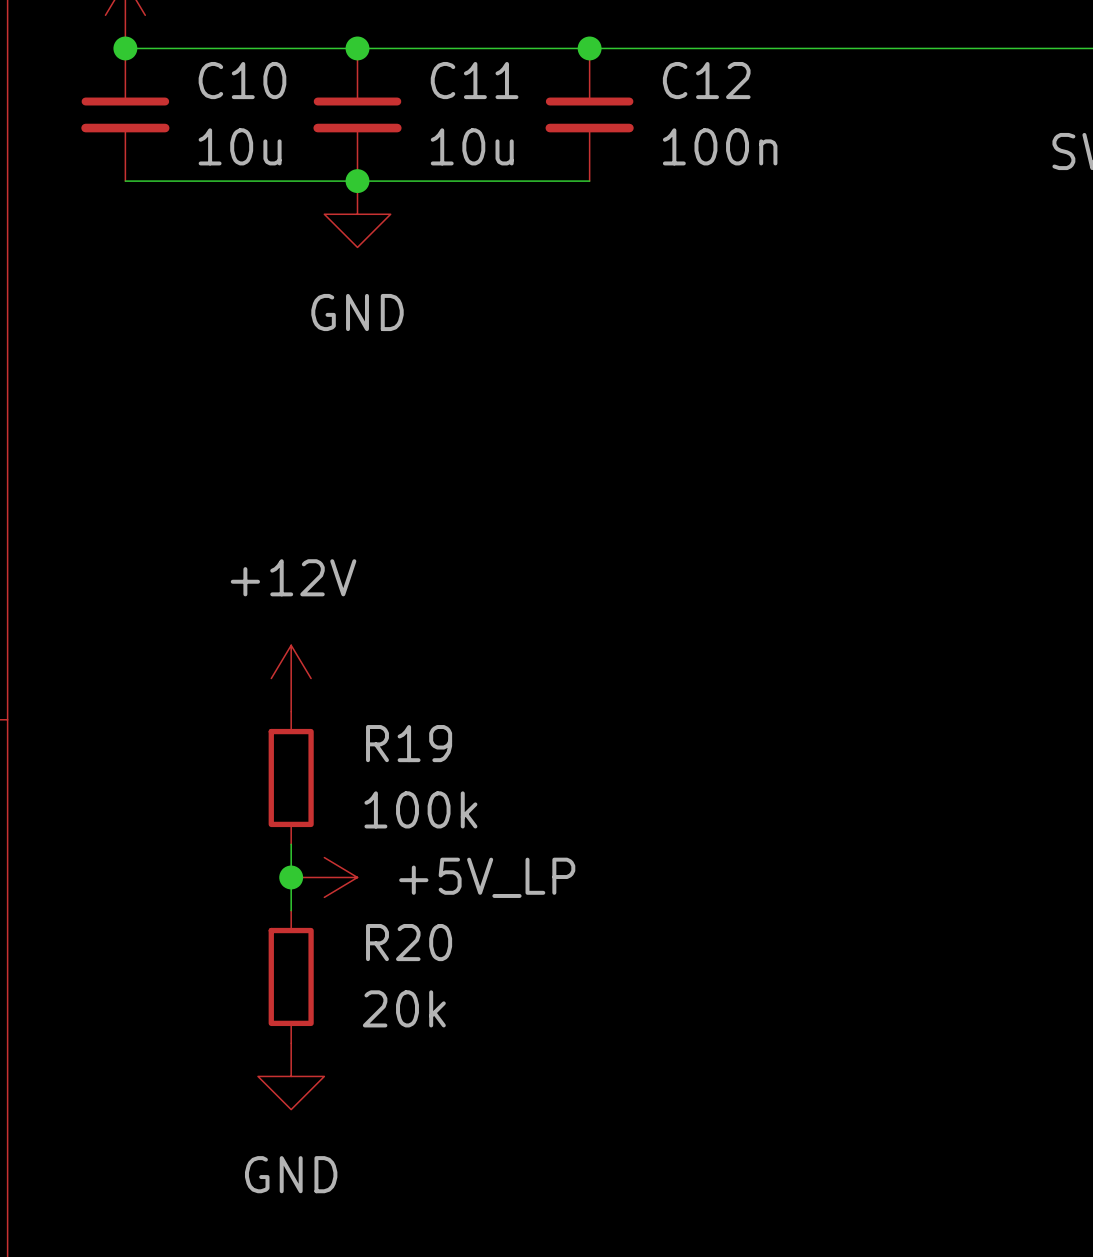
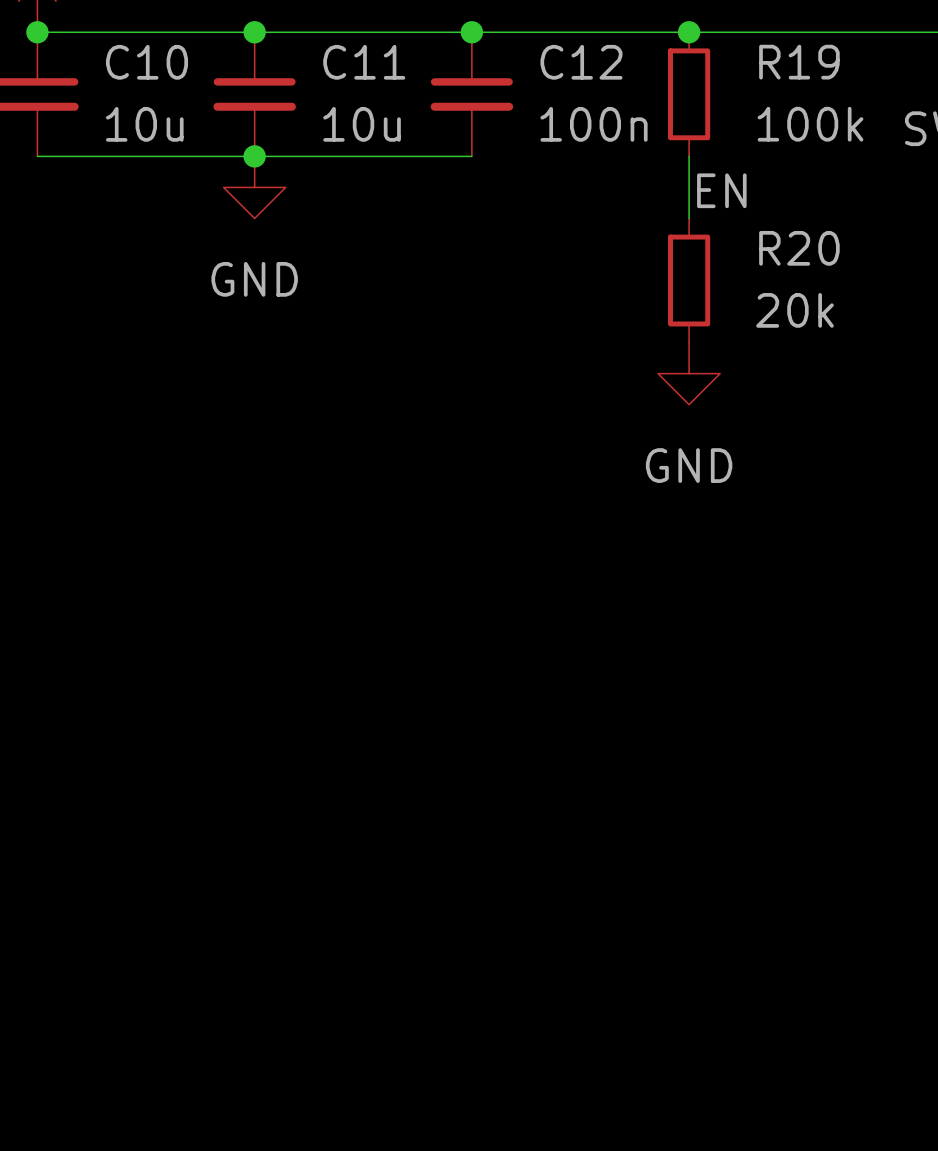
junction: none -> (689, 32)
wire: none -> (689, 156) (689, 218)
label: none -> EN (721, 190)
power symbol: none -> GND (689, 373)
power symbol: +12V (291, 678) -> none
R19 position: (291, 777) -> (689, 94)
wire: (291, 844) (291, 910) -> none
junction: (291, 877) -> none
power symbol: +5V_LP (324, 877) -> none
R20 position: (291, 976) -> (689, 280)
power symbol: GND (291, 1076) -> none

